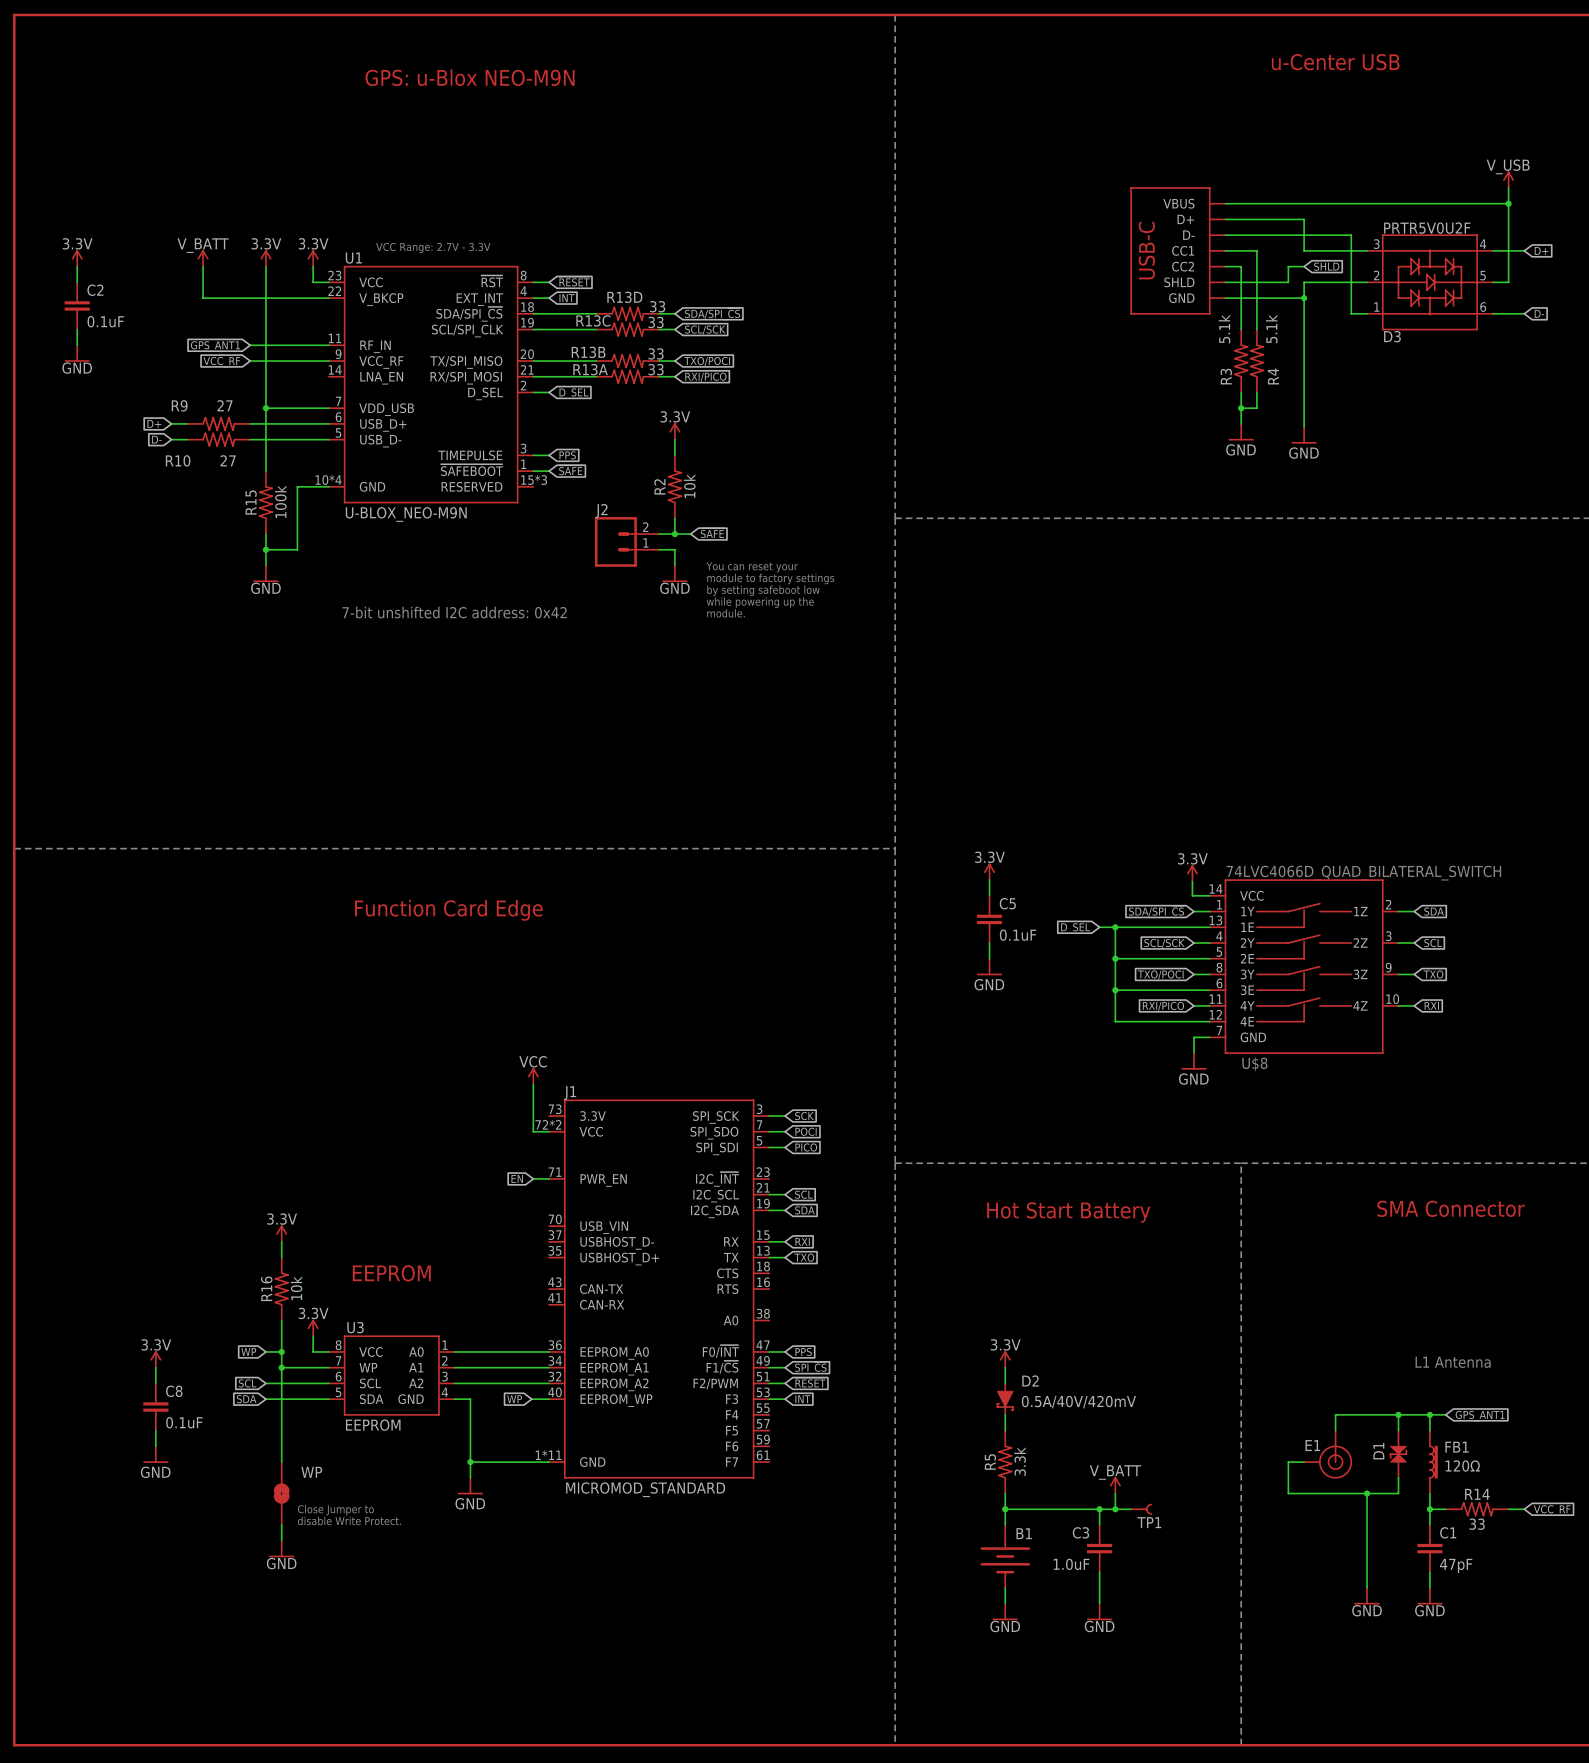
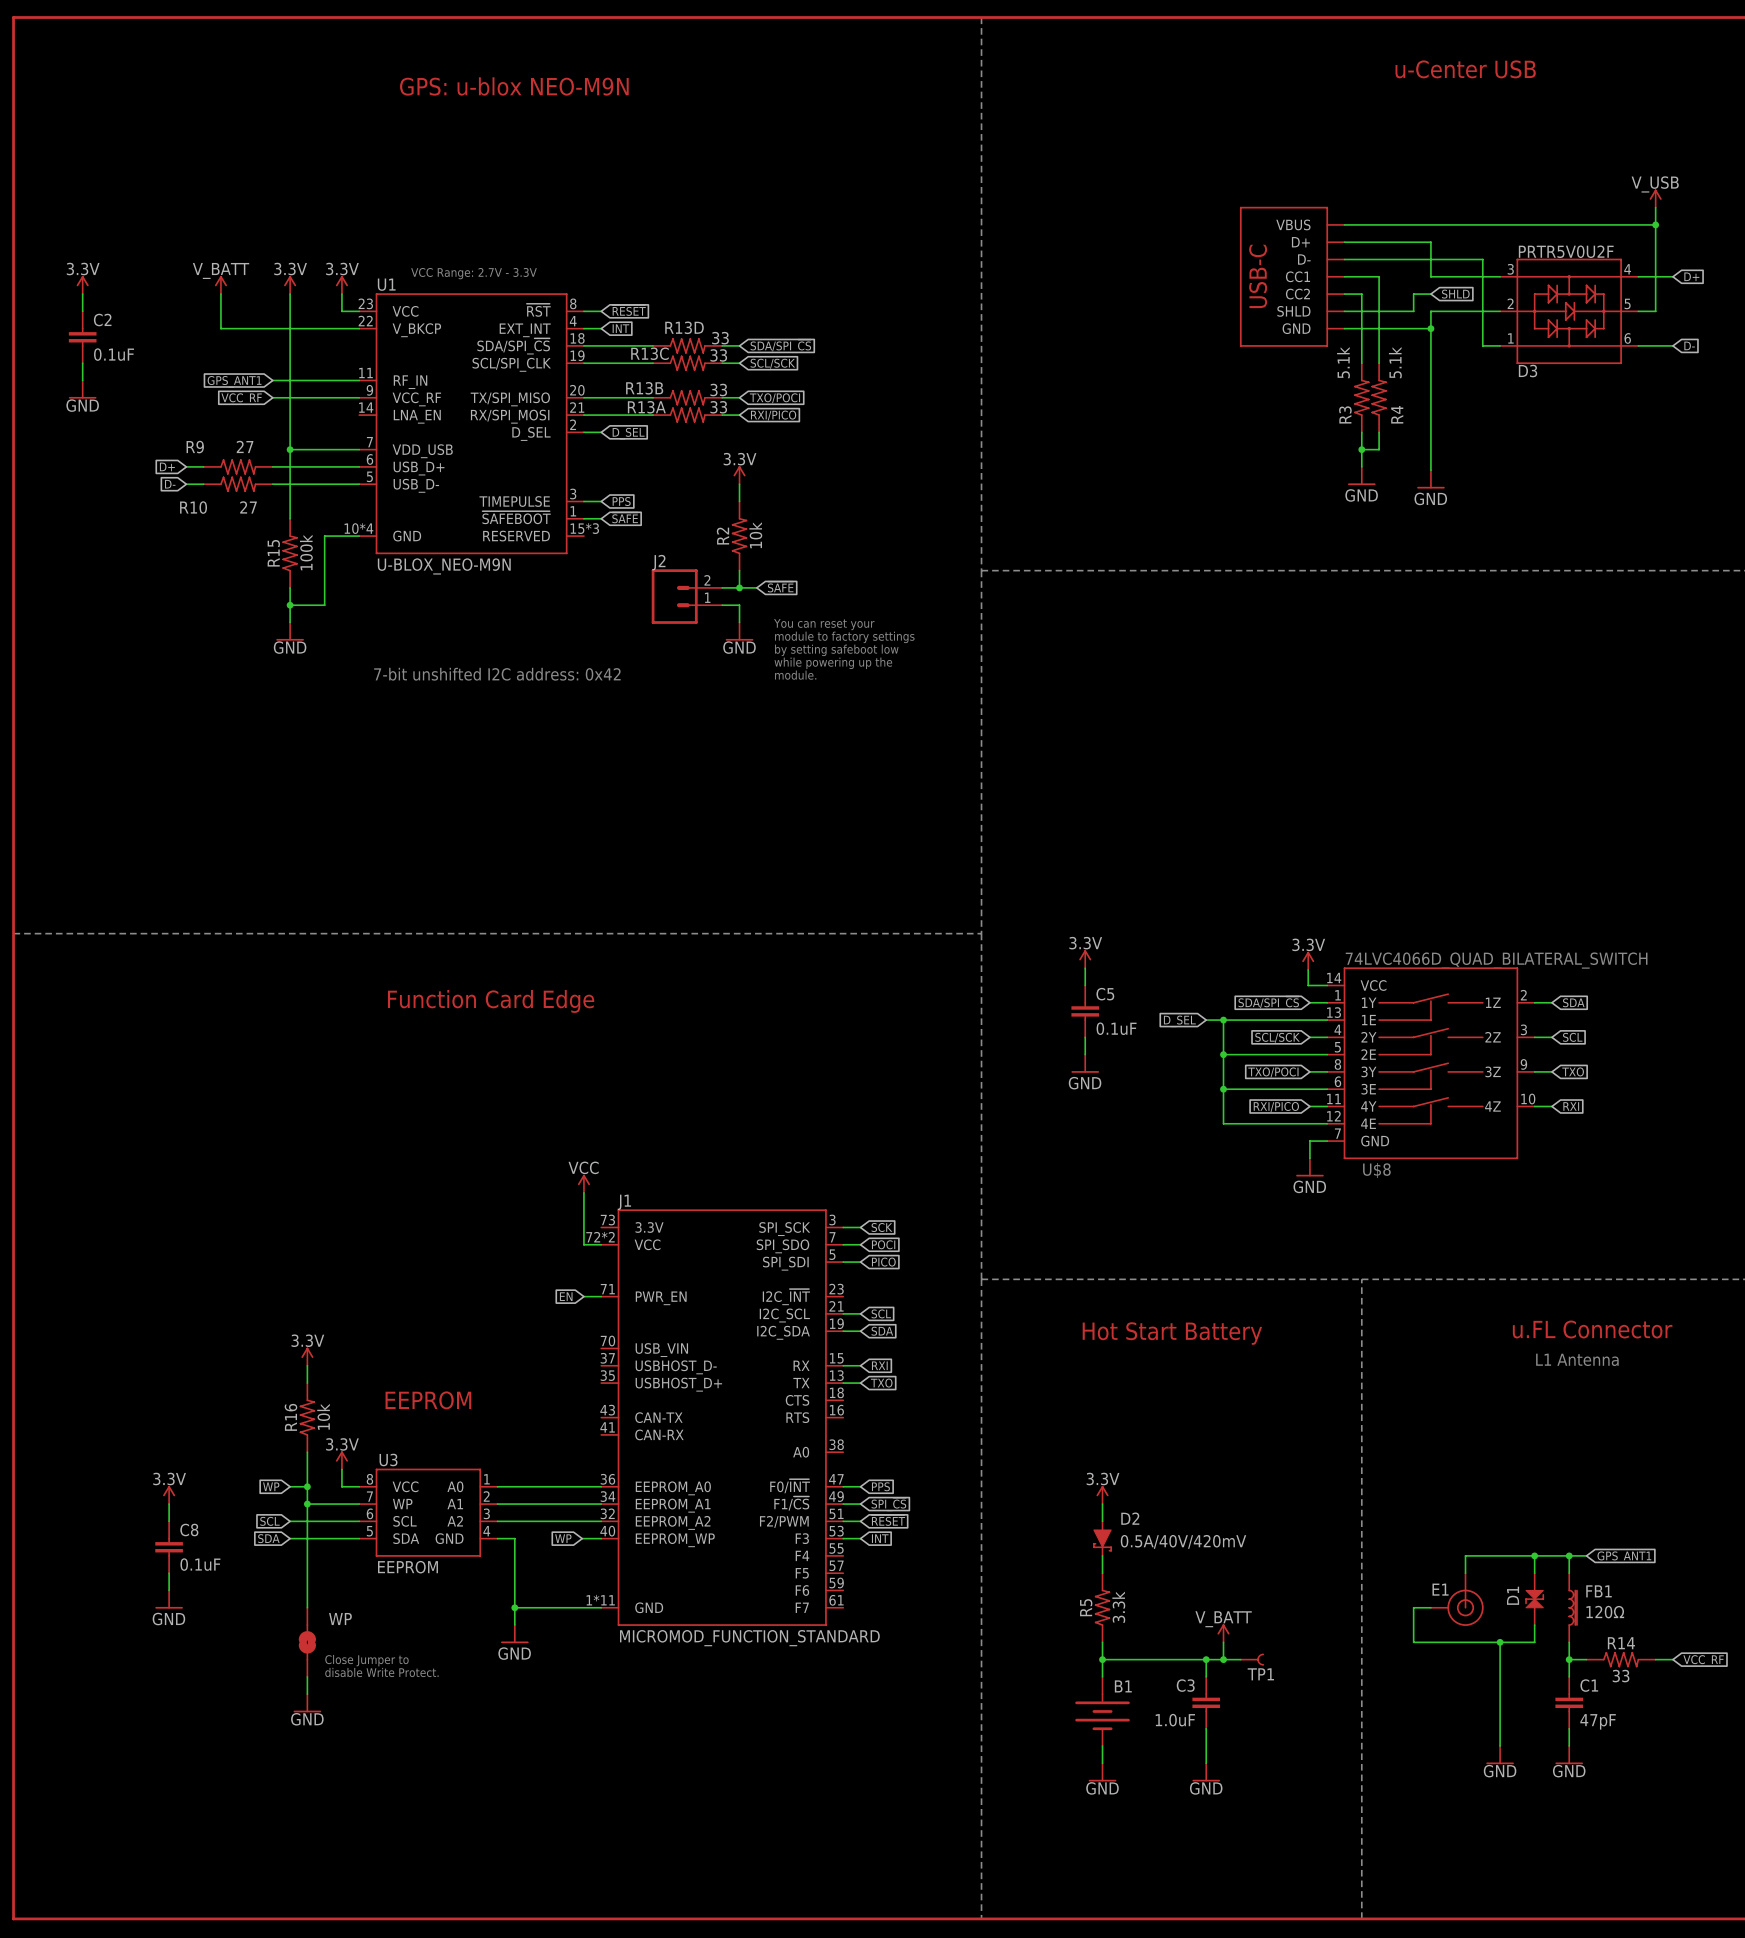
text: GPS: u-Blox NEO-M9N (470, 77) -> GPS: u-blox NEO-M9N (514, 86)
text: SMA Connector (1451, 1208) -> u.FL Connector (1592, 1329)
text position: L1 Antenna (1453, 1362) -> L1 Antenna (1577, 1359)
J1 value: MICROMOD_STANDARD (645, 1489) -> MICROMOD_FUNCTION_STANDARD (749, 1638)

